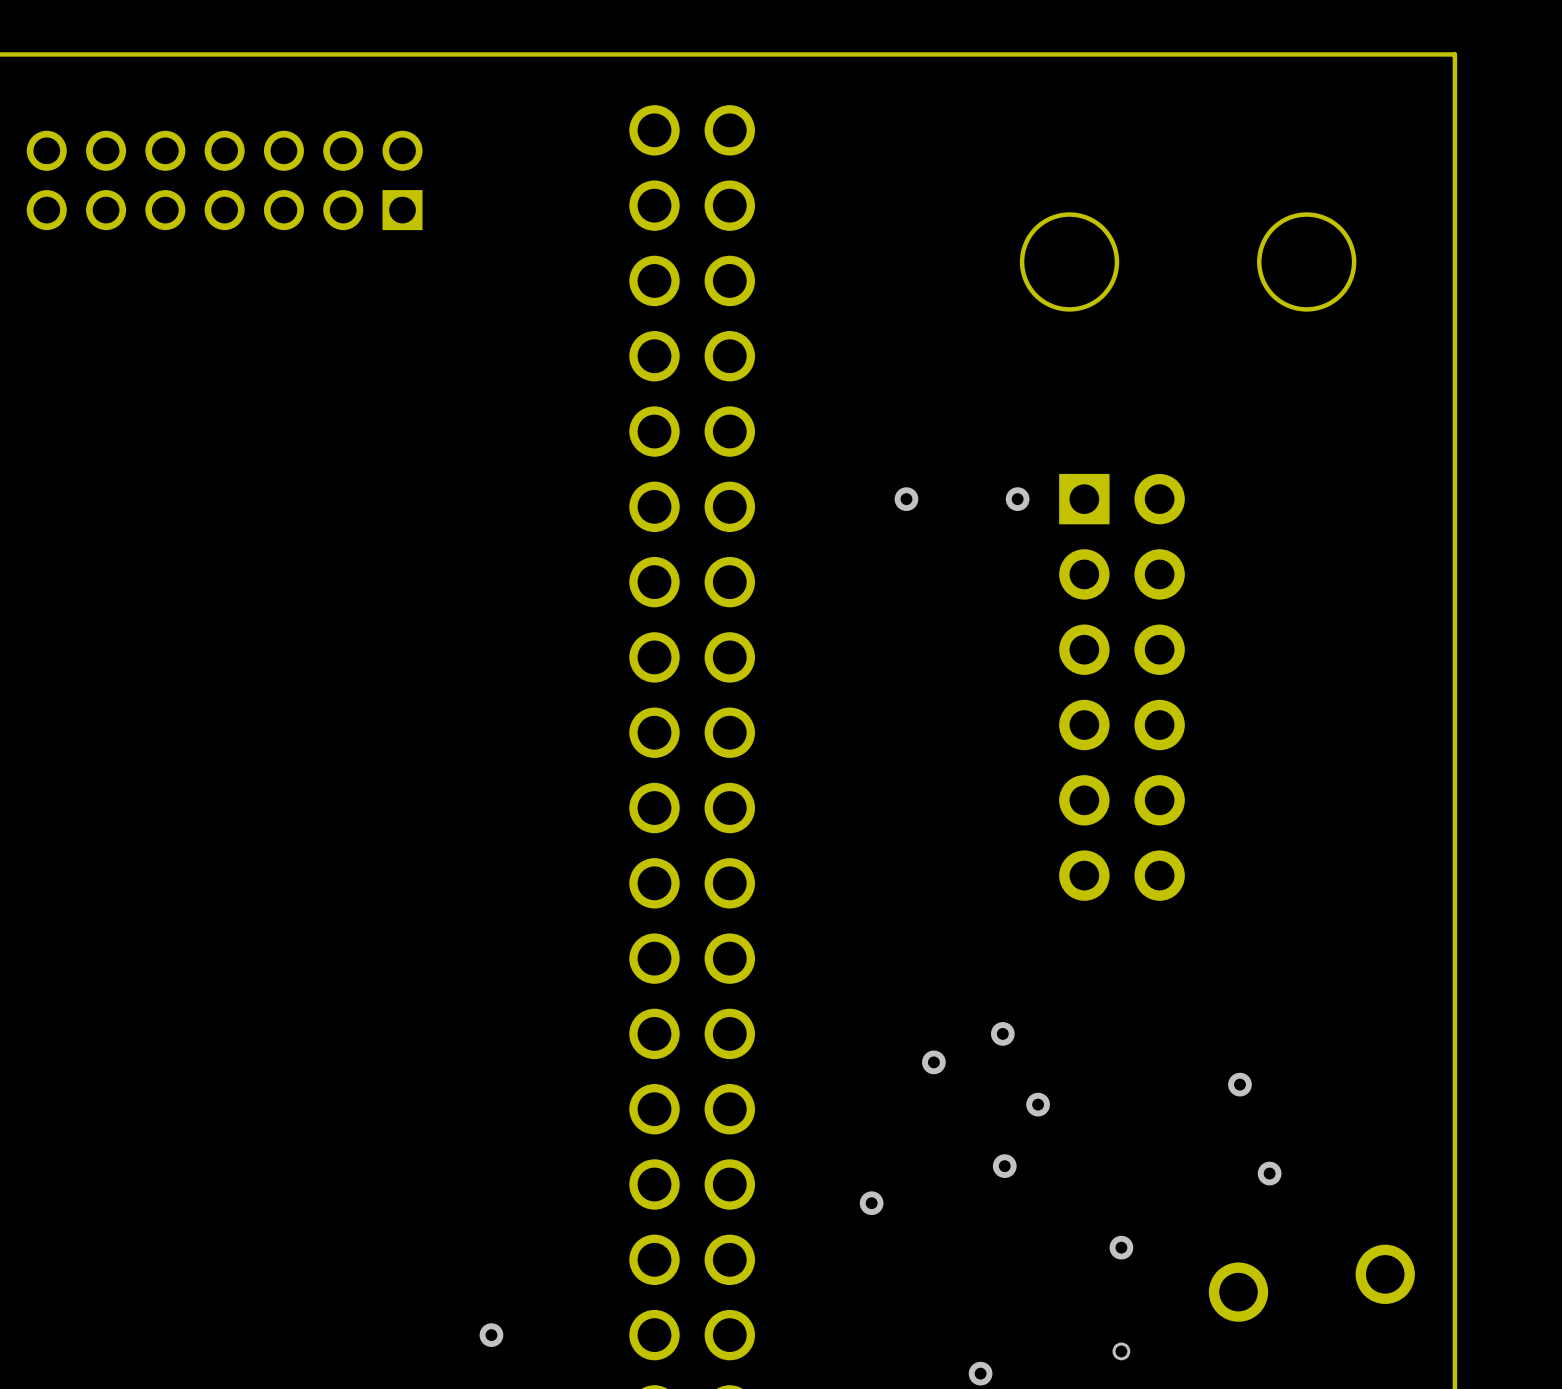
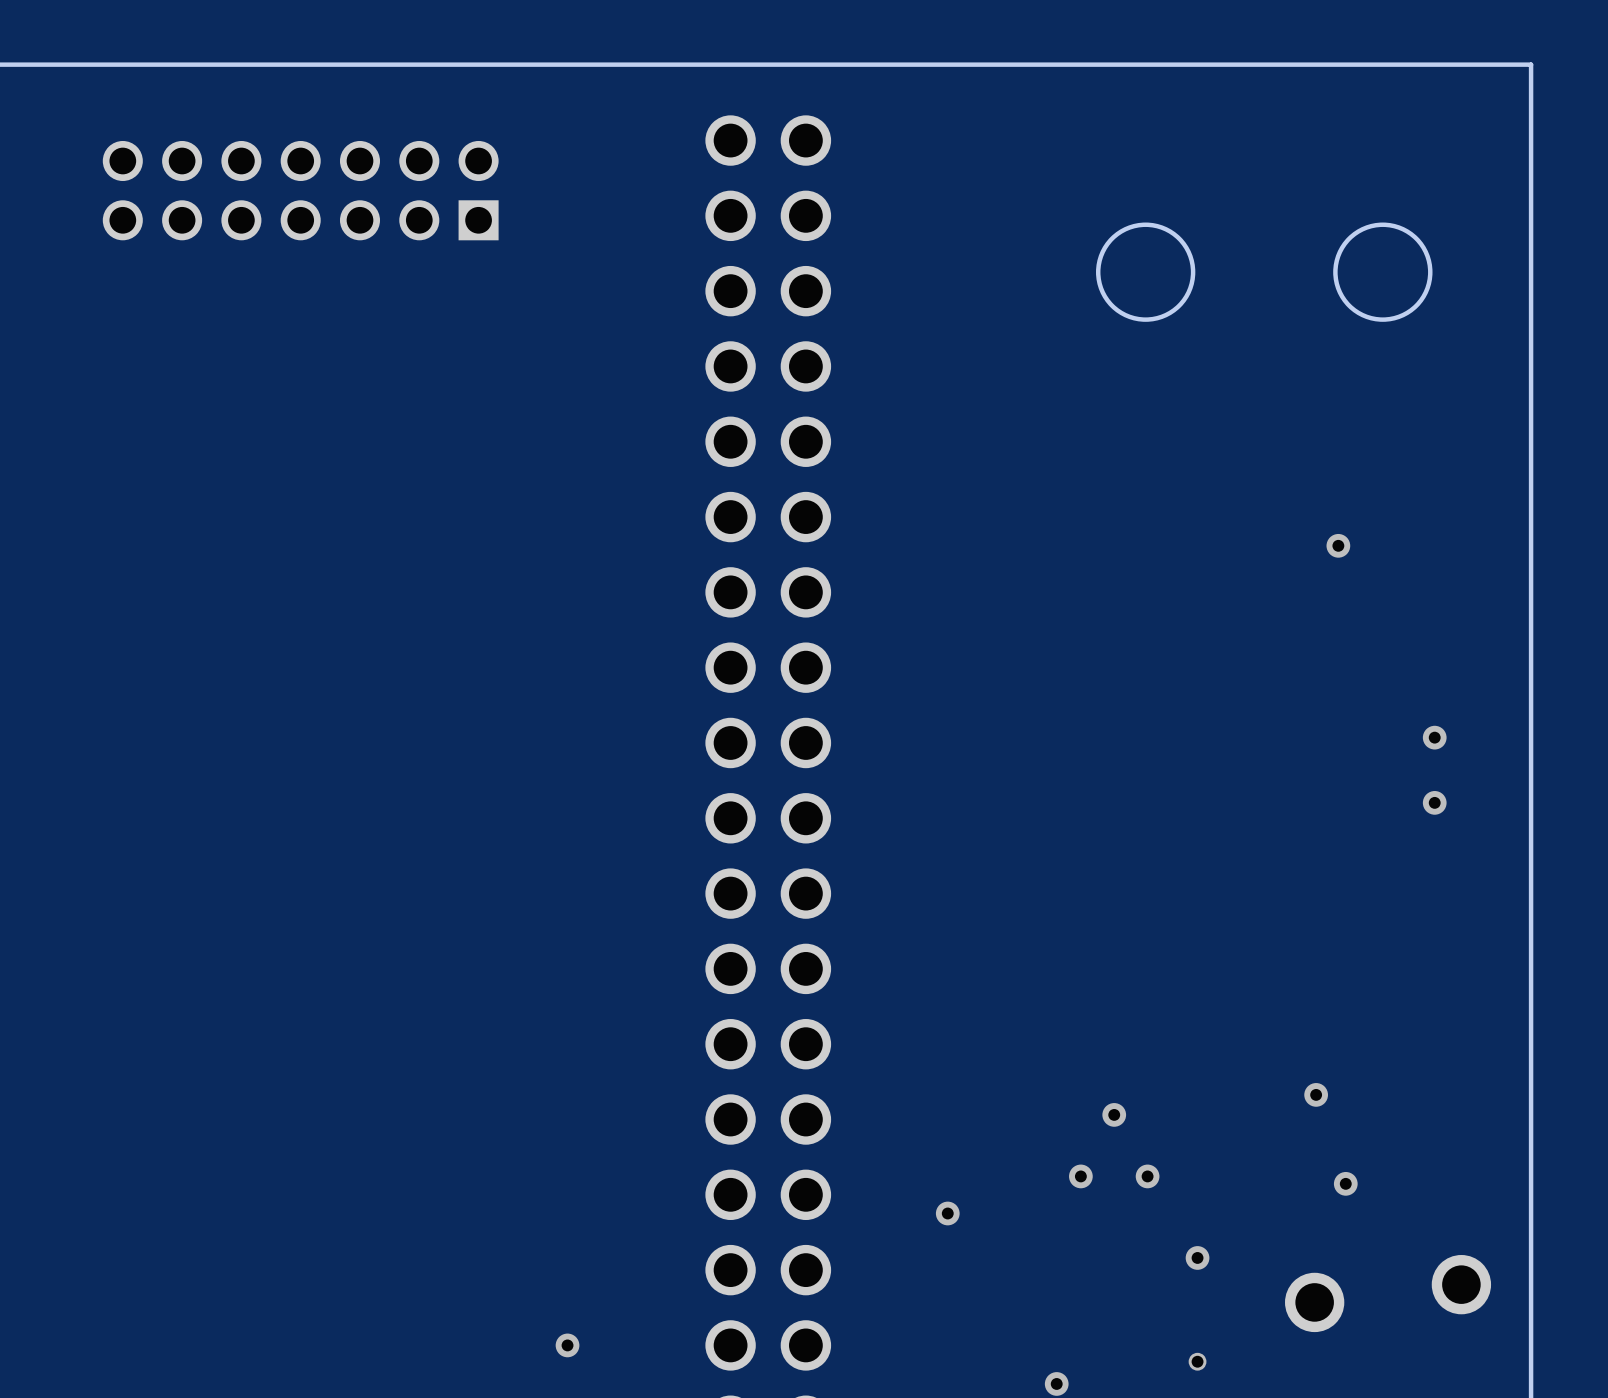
via: (906, 499) -> none
via: (1017, 499) -> none
via: none -> (1338, 545)
part: (1121, 687) -> none
via: none -> (1434, 737)
via: none -> (1434, 802)
via: (1002, 1033) -> none
via: (933, 1062) -> none
via: none -> (1147, 1176)

